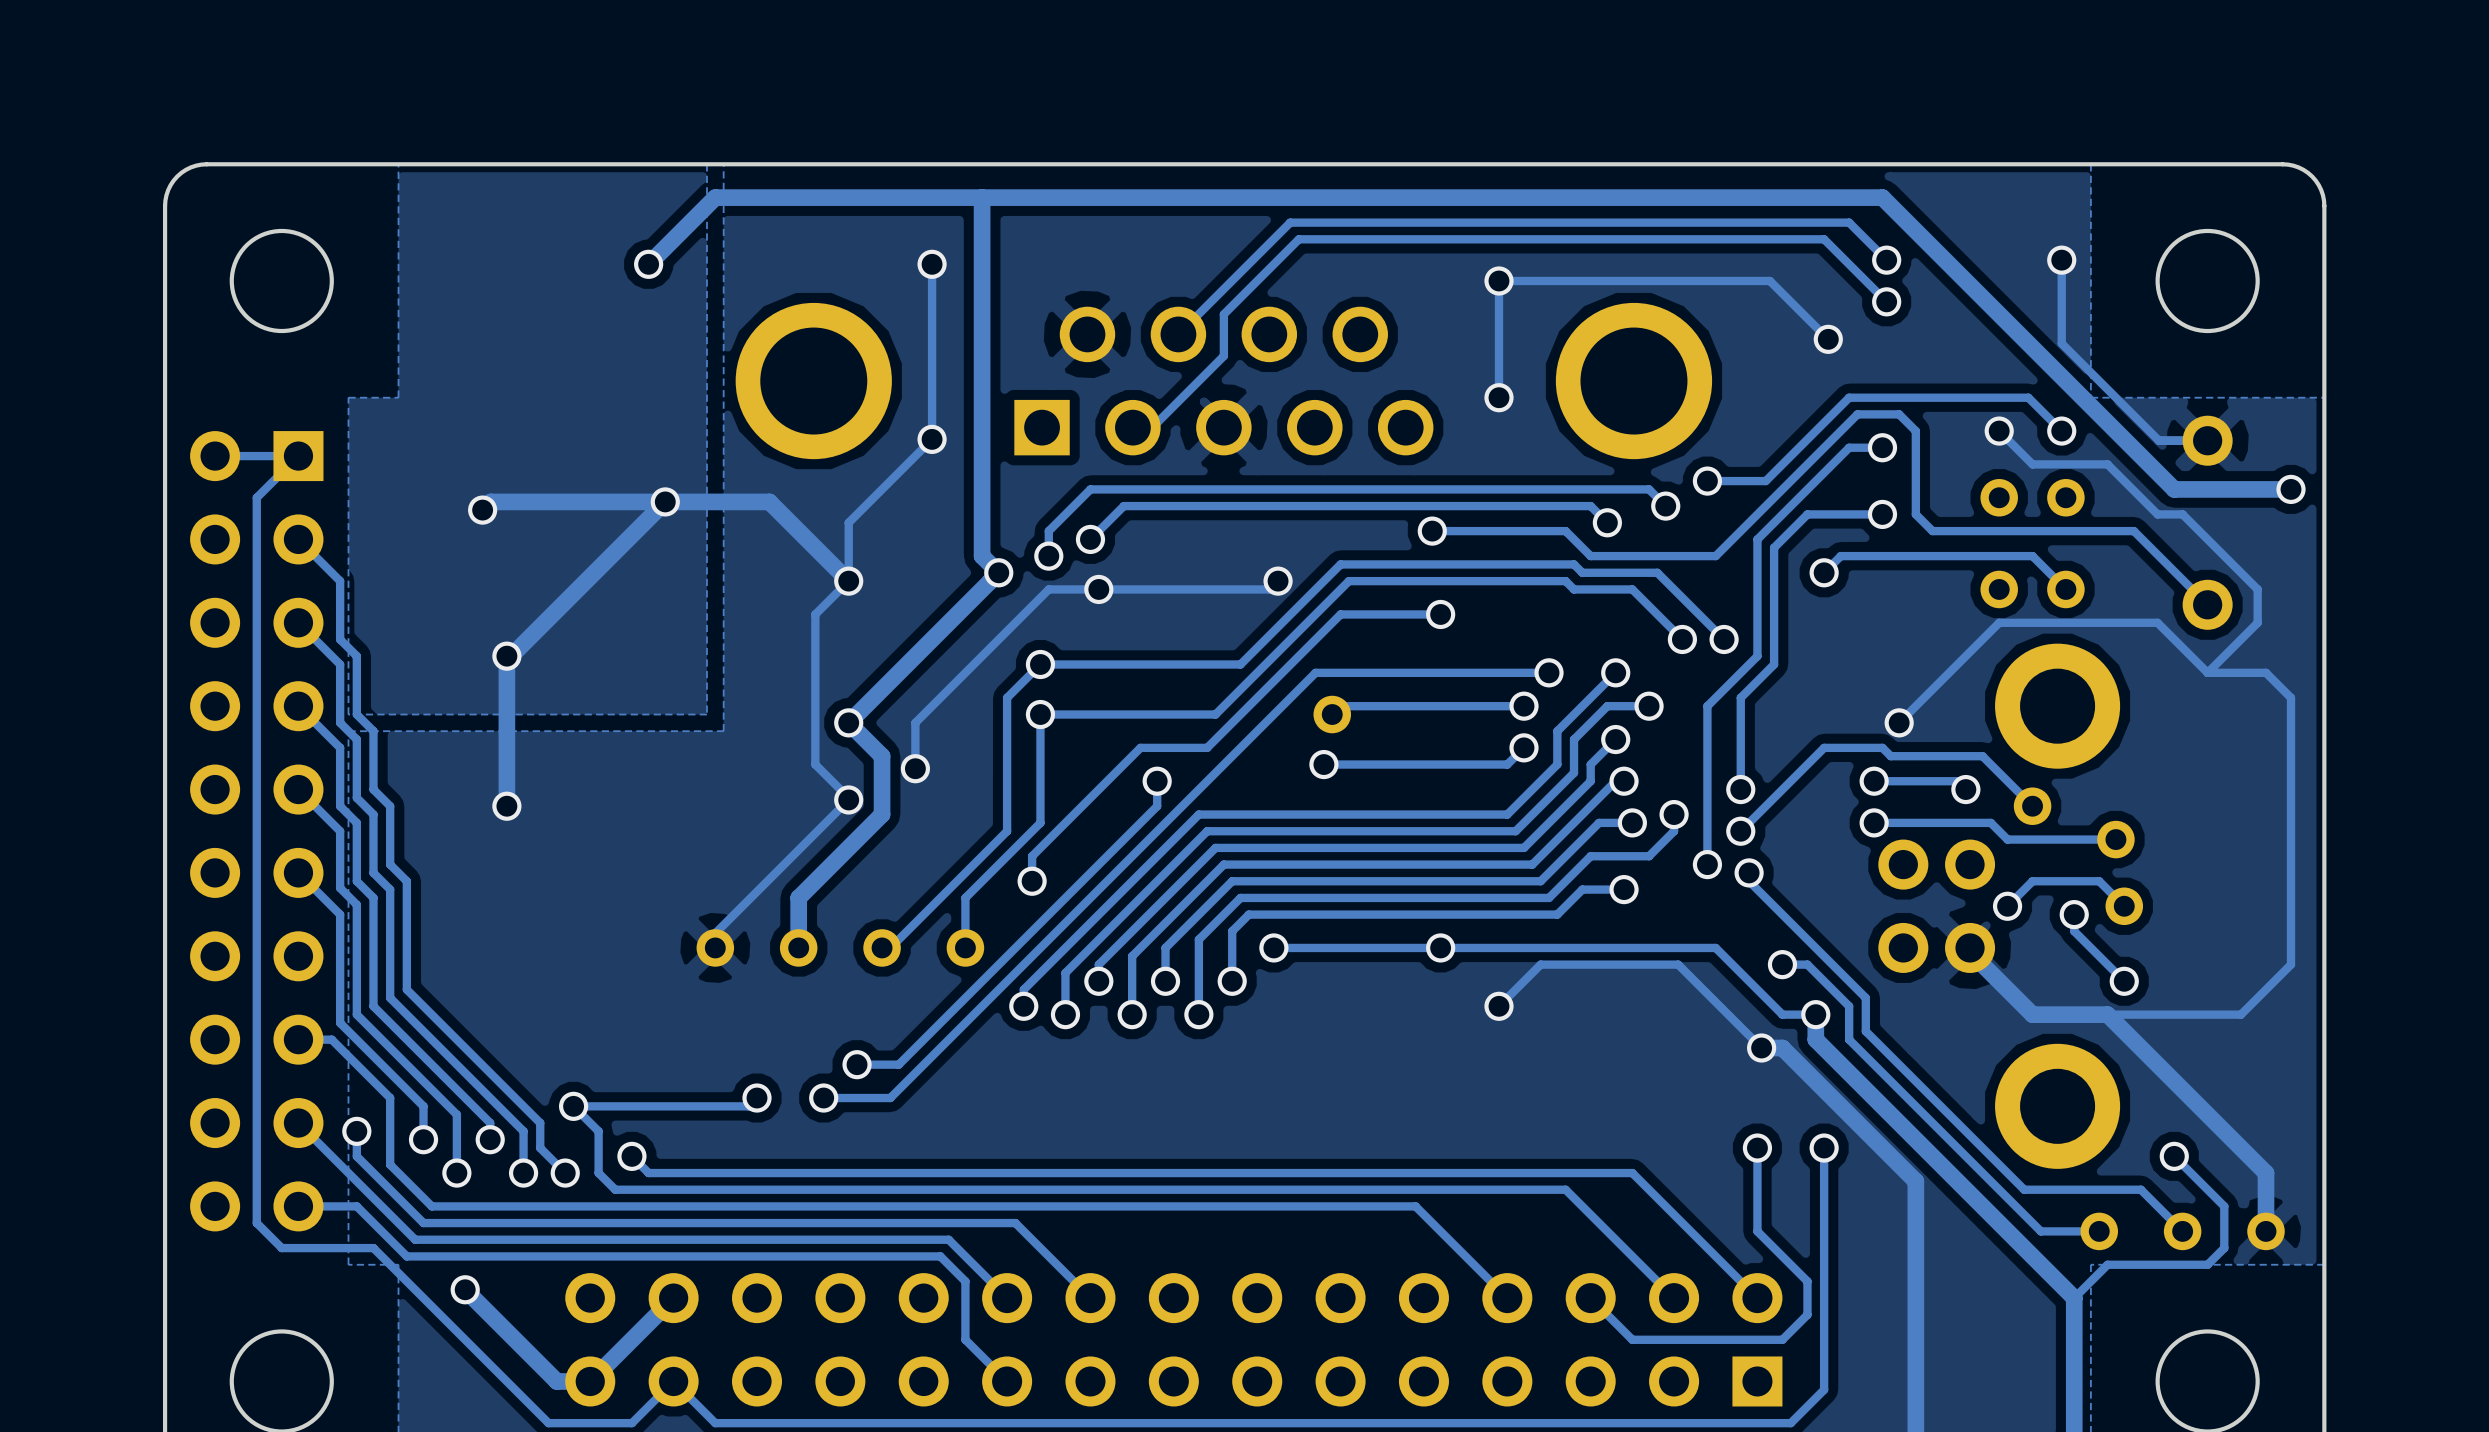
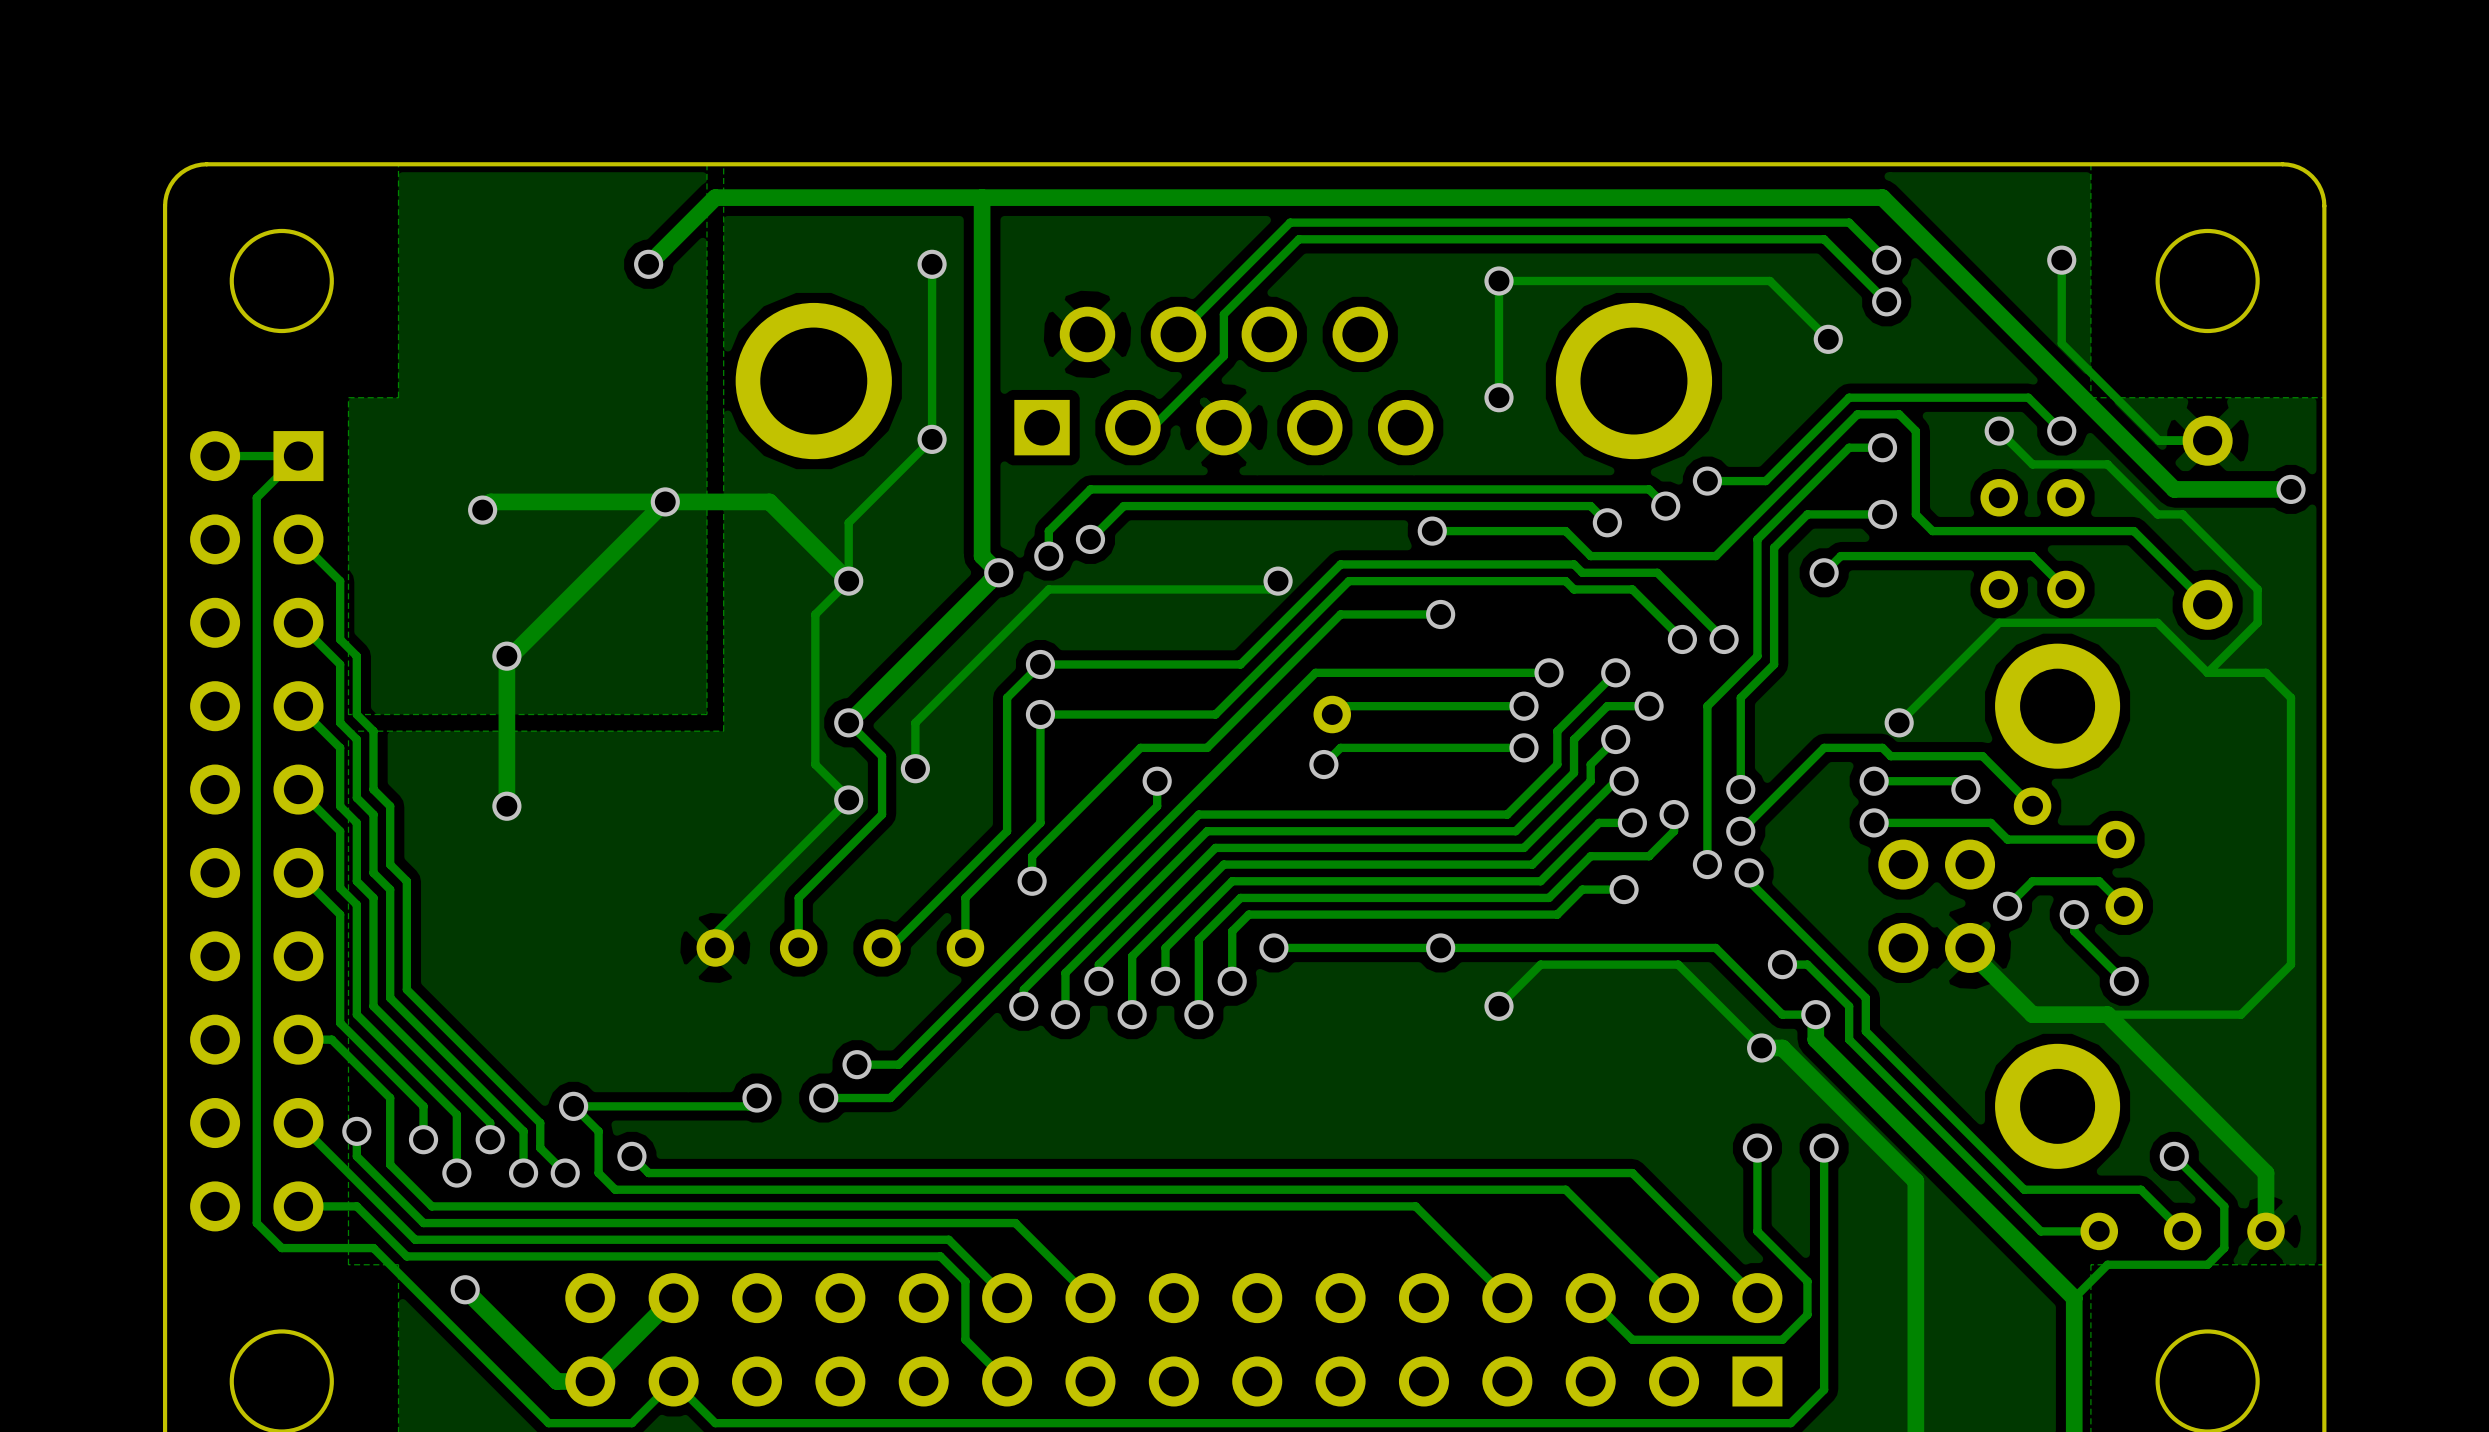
via: (1098, 589) -> none
track width: thick (848, 722) (882, 756) (882, 814) (798, 897) (798, 947) -> thin (848, 722) (882, 756) (882, 814) (798, 897) (798, 947)
track: (1524, 747) (1507, 764) (1323, 764) -> (1524, 747) (1340, 747) (1323, 764)

